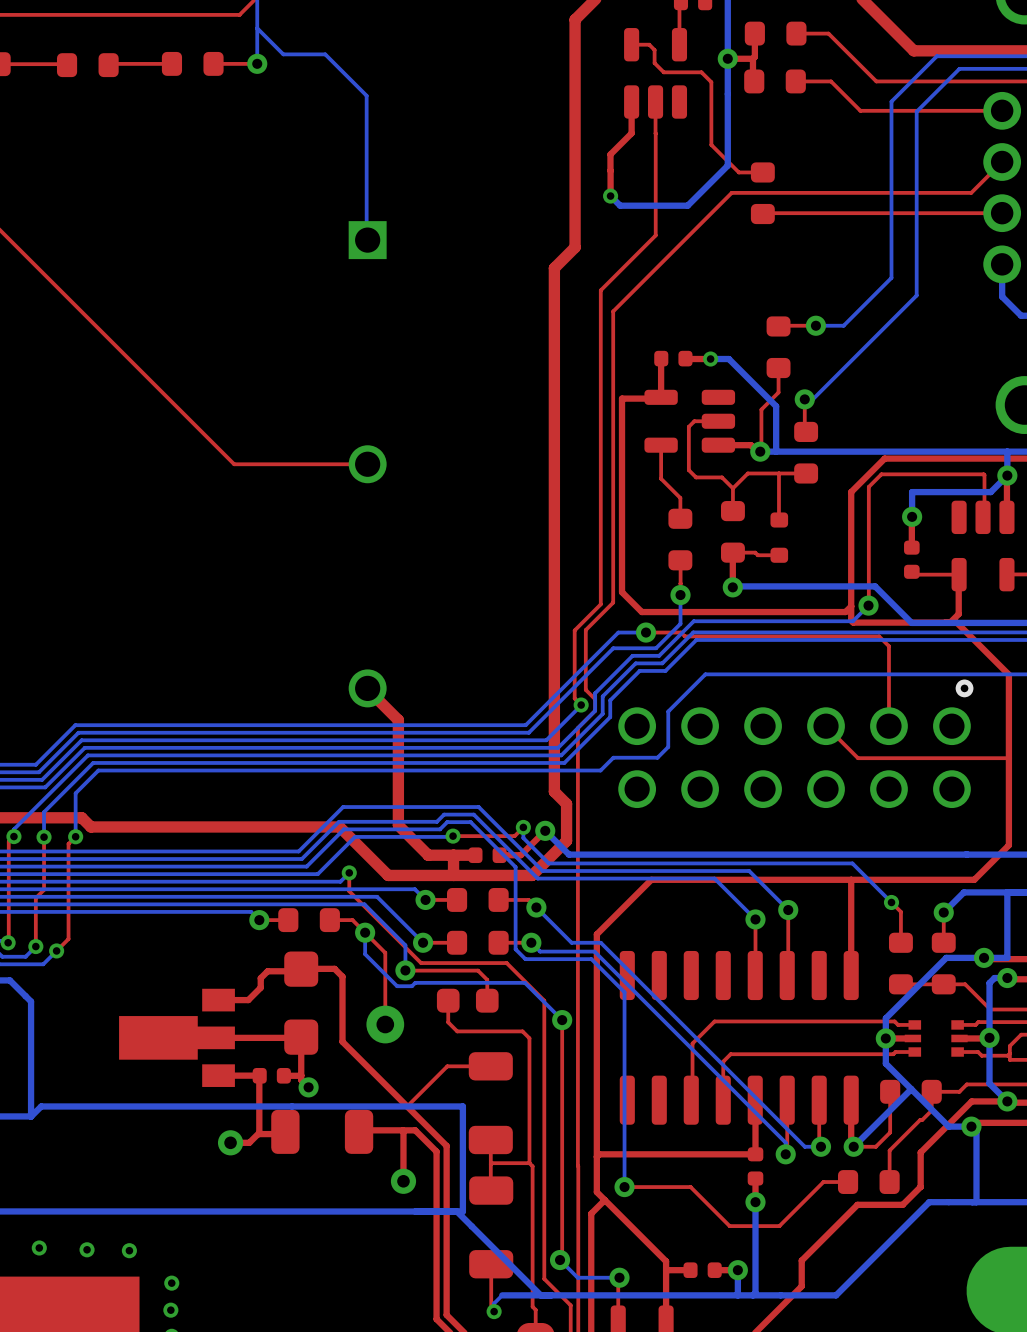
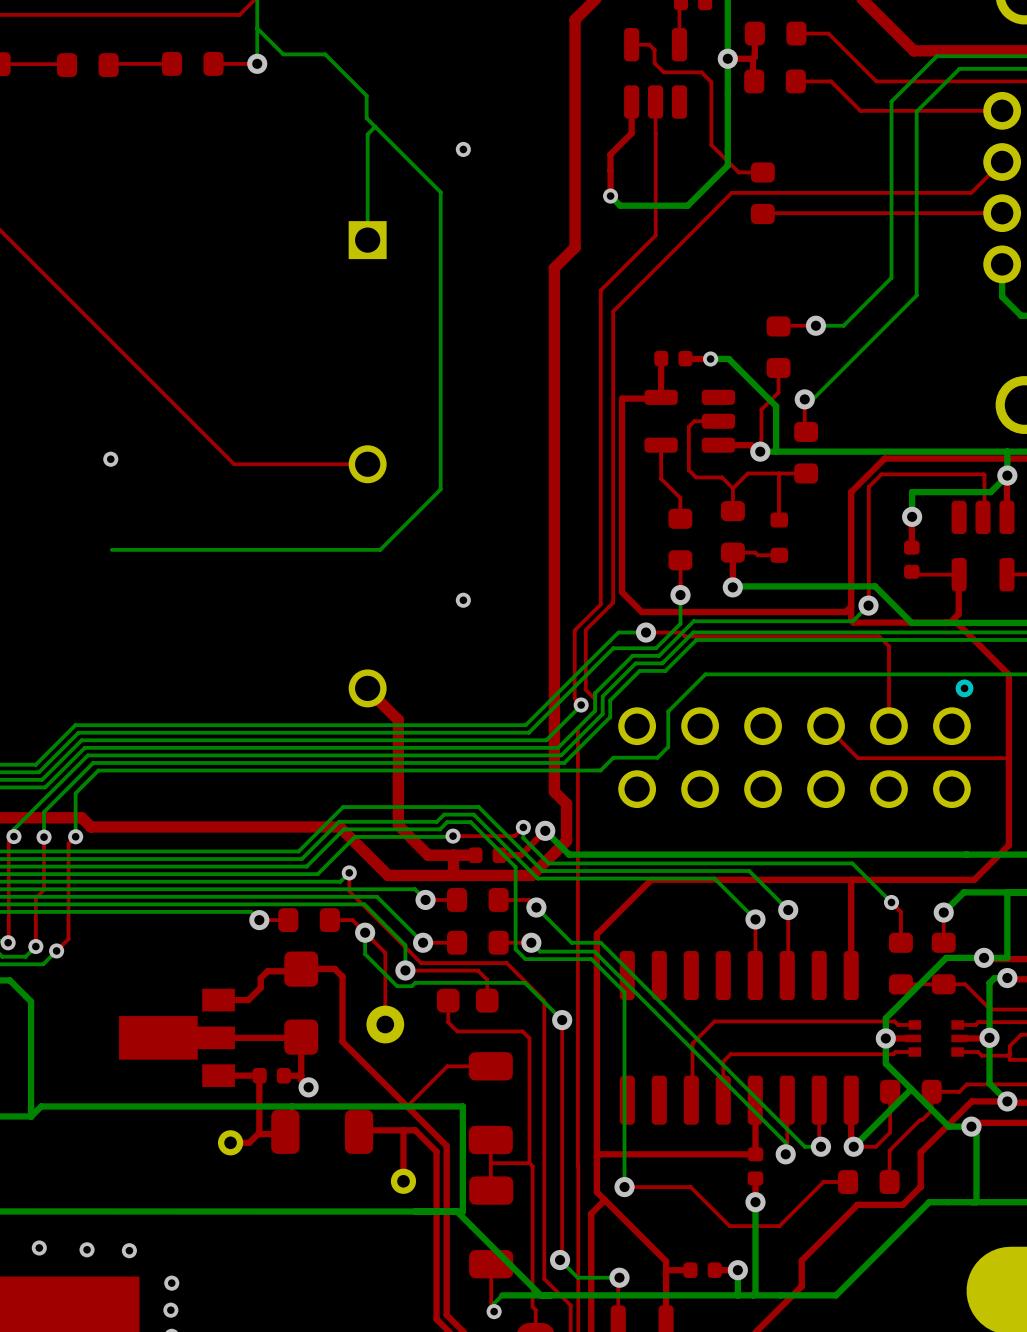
bottom track: (366, 118) (366, 240) -> (366, 118) (440, 192) (440, 489) (380, 549) (111, 549)
bottom track: none -> (375, 126) (367, 134) (367, 230)
via: none -> (463, 149)
via: none -> (110, 459)
via: none -> (463, 600)

